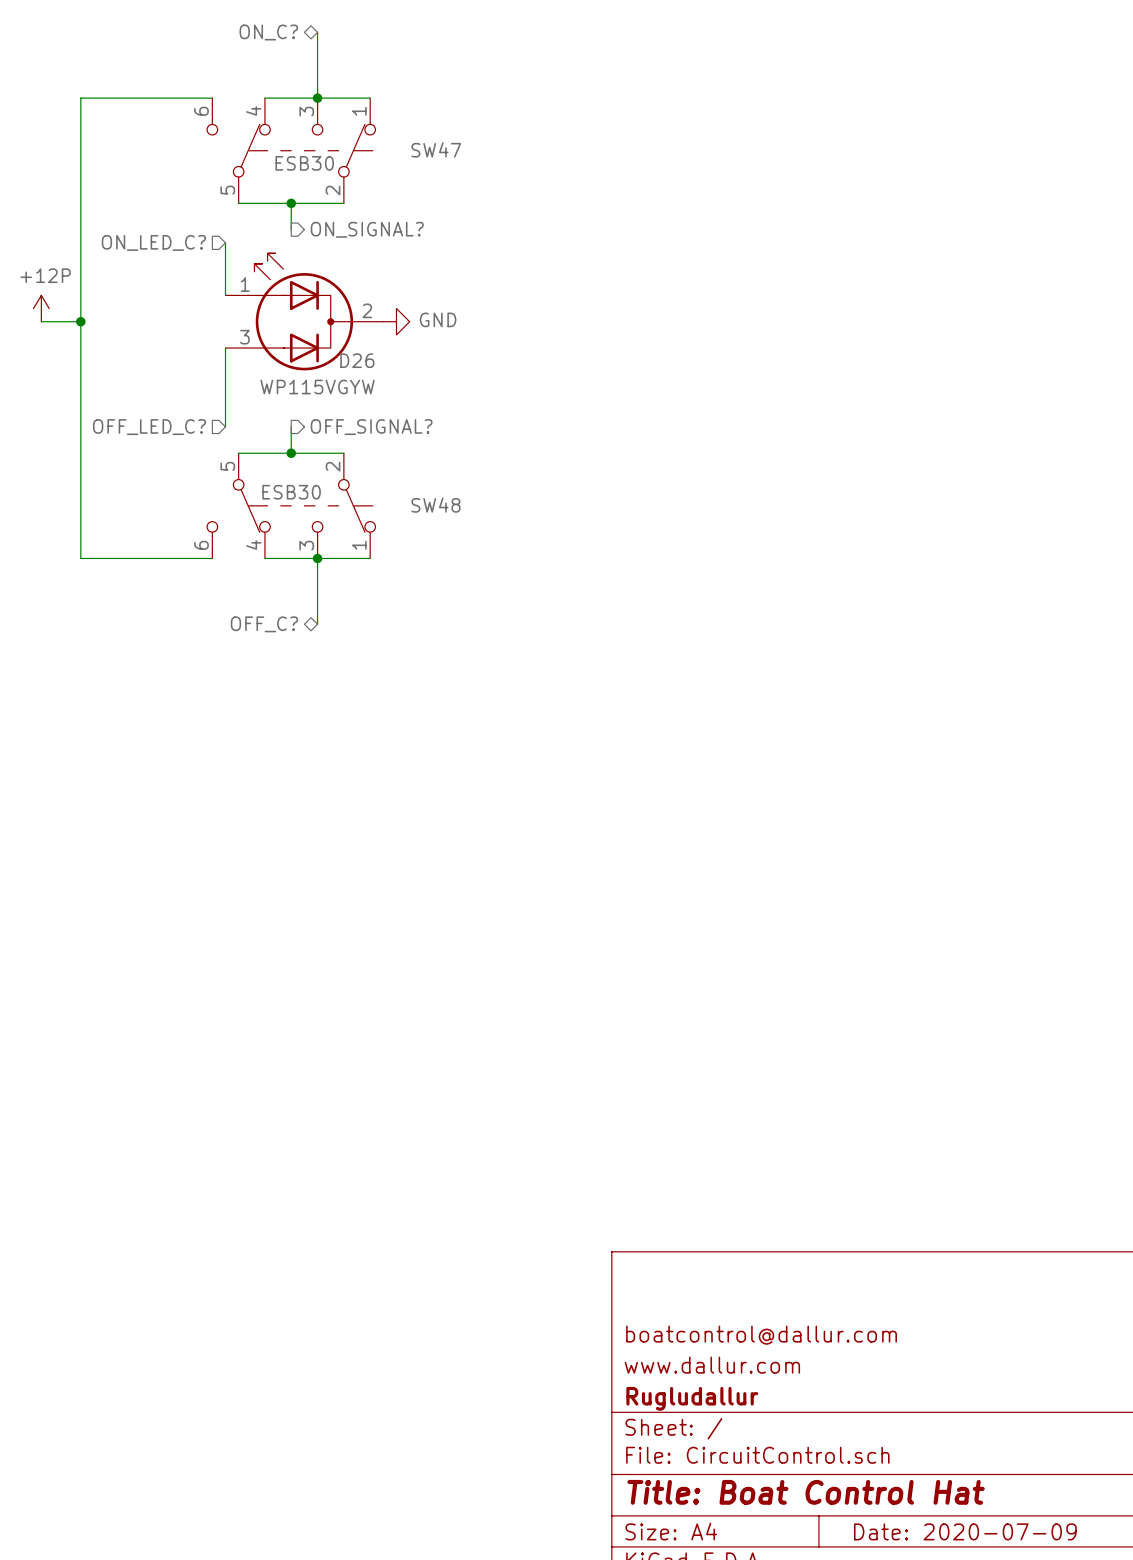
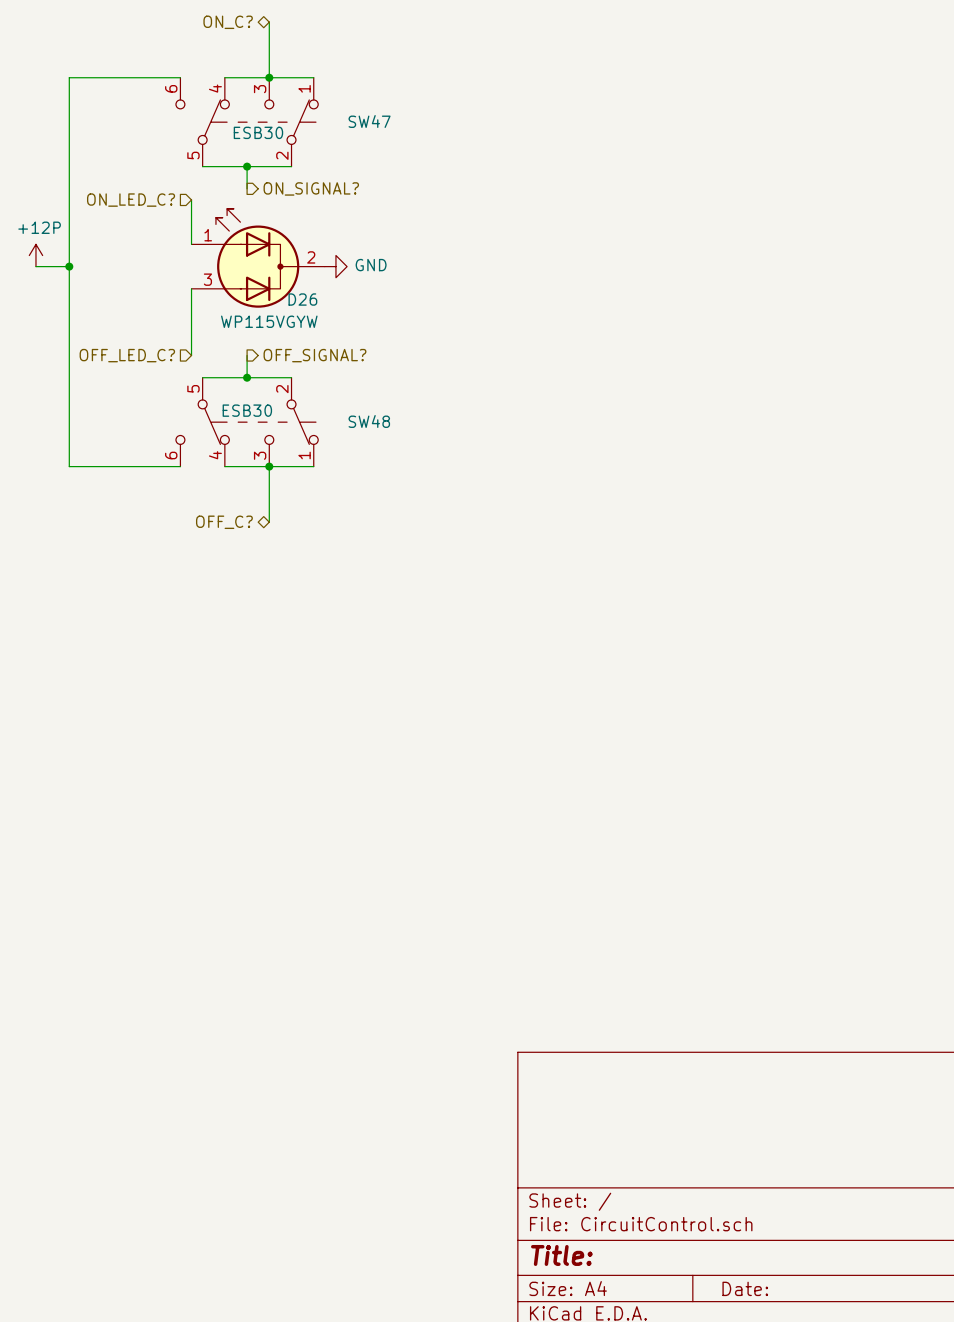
title block: boatcontrol@dallur.com (761, 1335) -> none
title block: www.dallur.com (712, 1365) -> none
title block: Rugludallur (692, 1398) -> none
title block: Title: Boat Control Hat (806, 1492) -> Title: (561, 1255)
title block: Date: 2020-07-09 (965, 1531) -> Date: (745, 1288)

